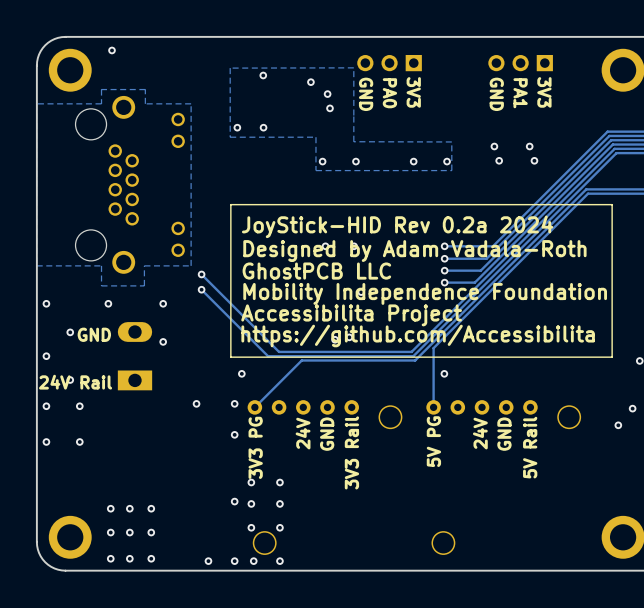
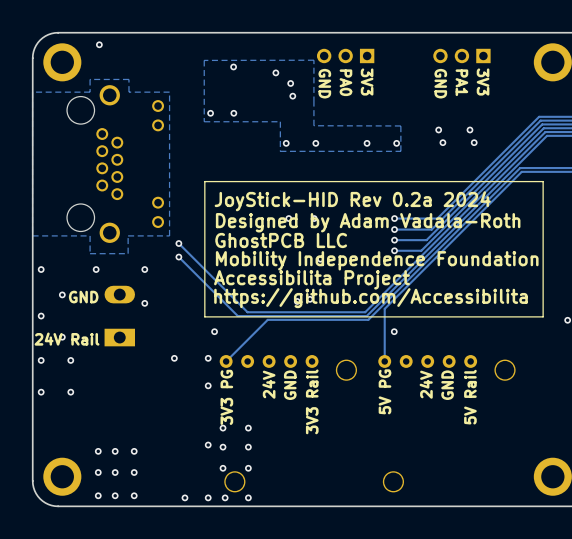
via: (632, 408) -> none
via: (618, 425) -> none

